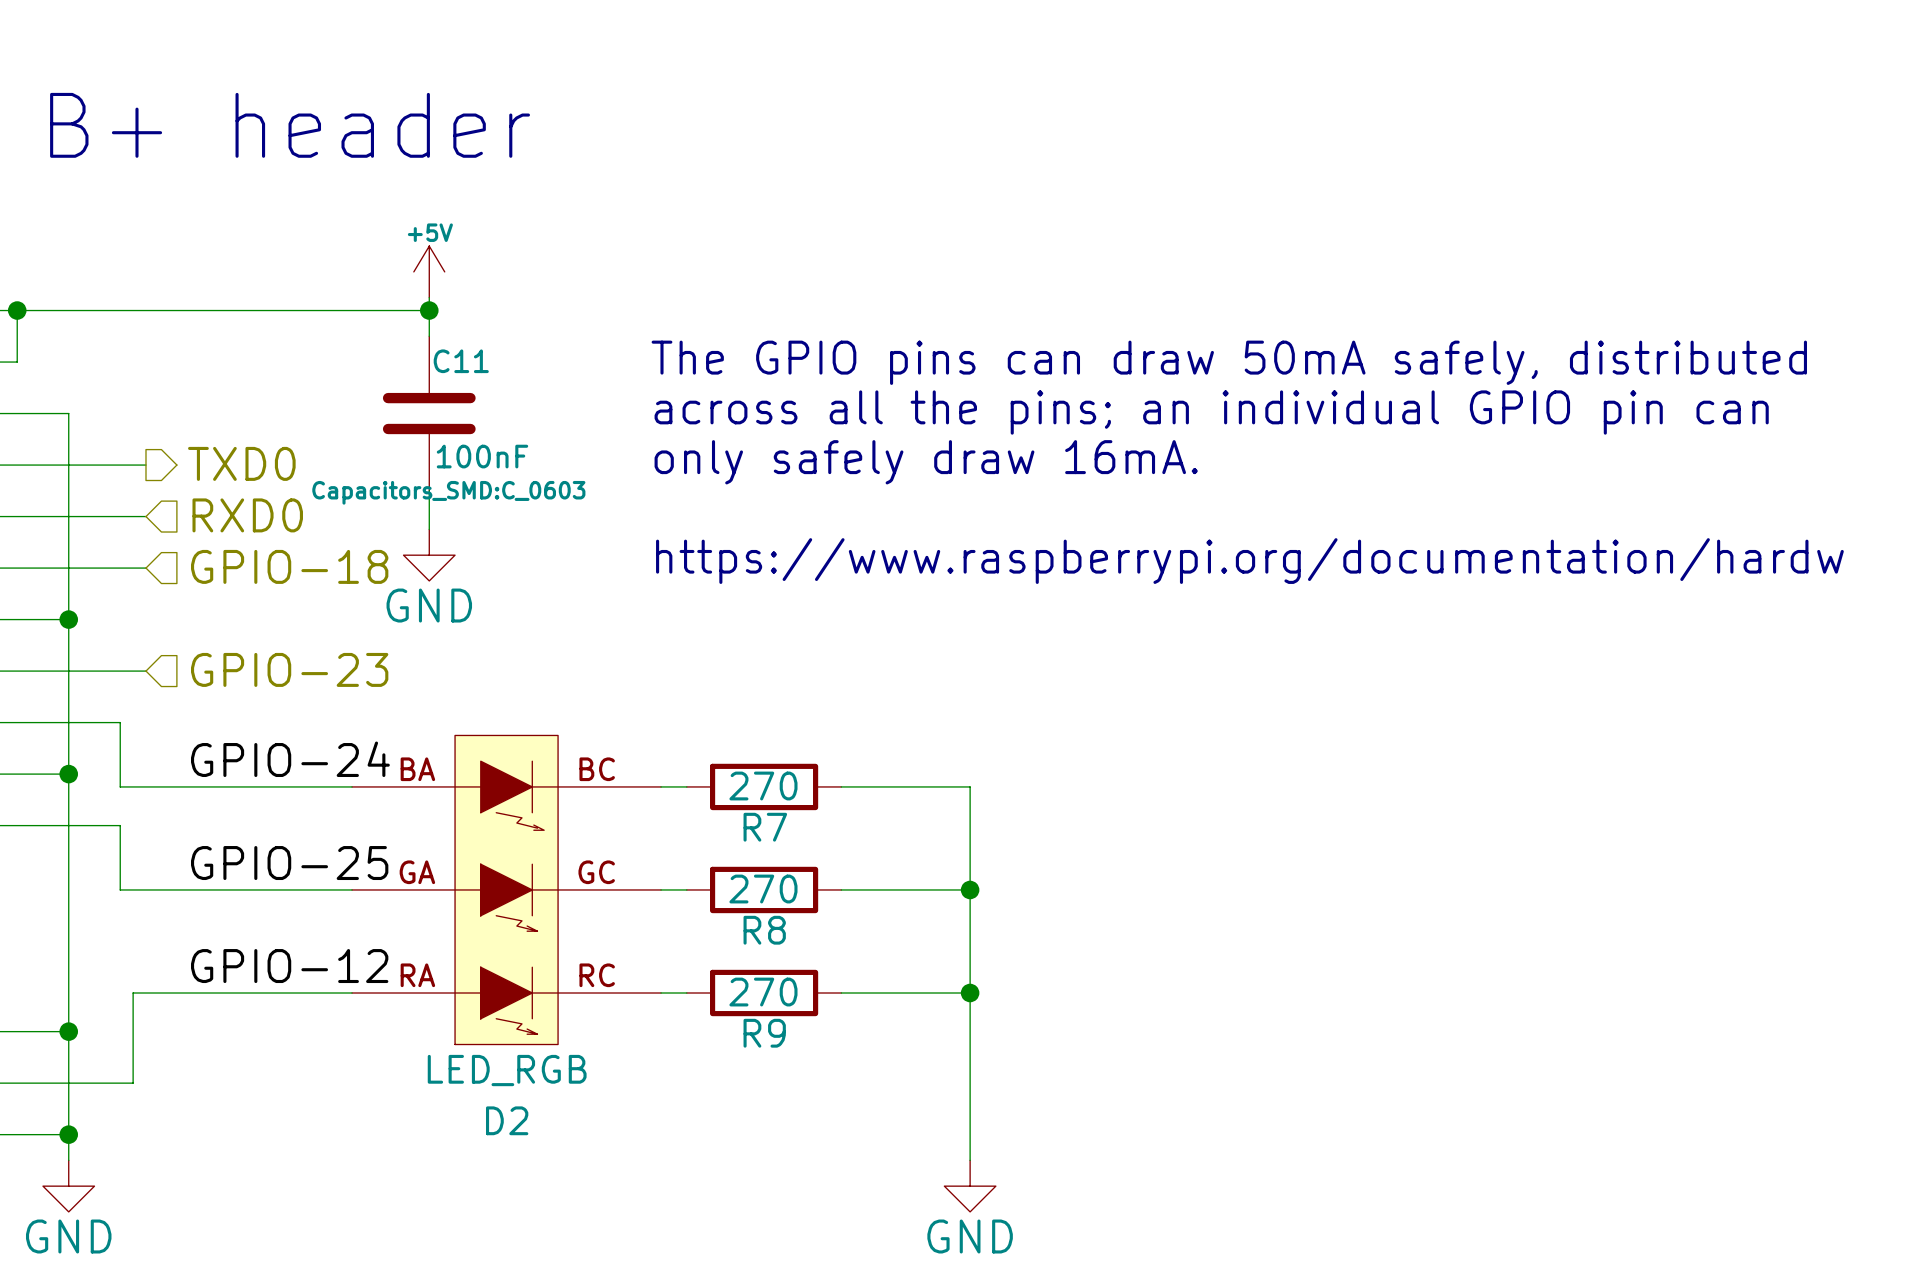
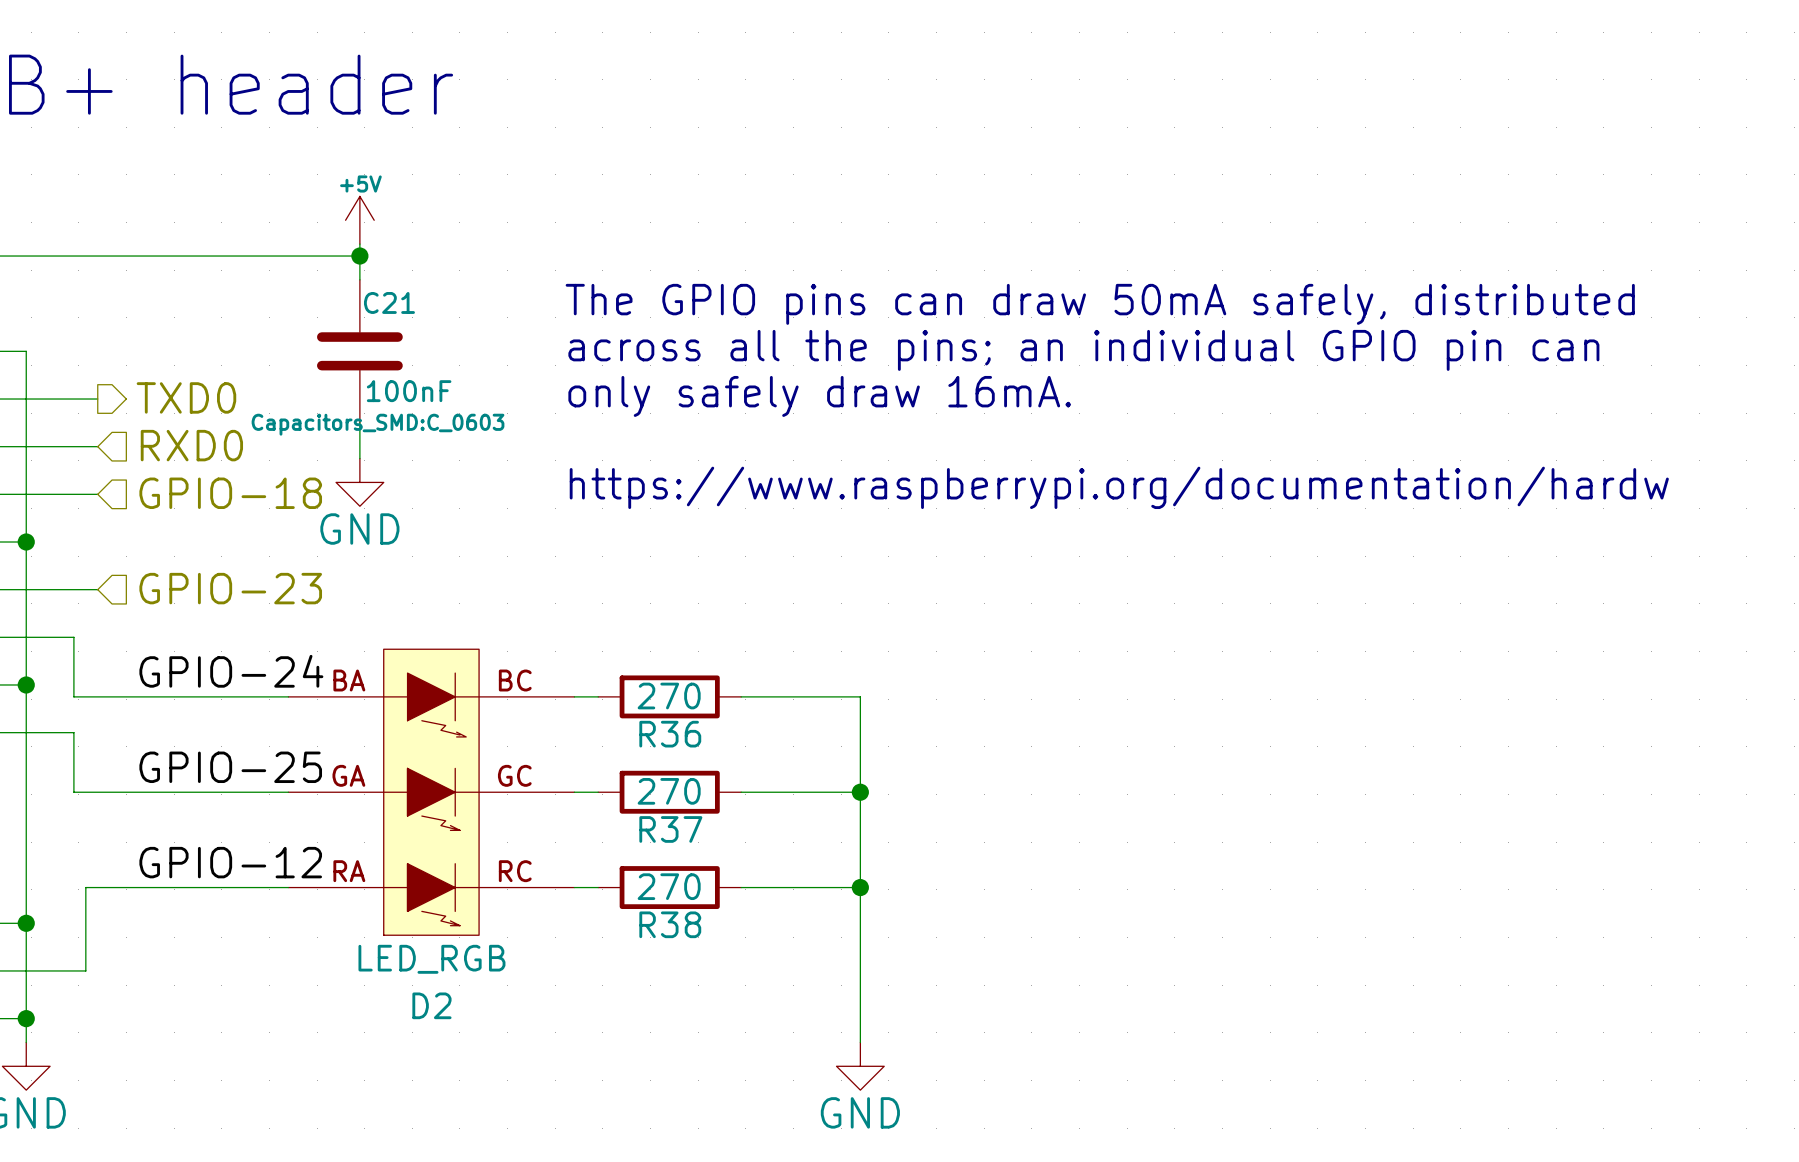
C11 name: C11 (461, 361) -> C21 (389, 302)
R7 name: R7 (765, 827) -> R36 (670, 734)
R8 name: R8 (764, 930) -> R37 (670, 829)
R9 name: R9 (764, 1033) -> R38 (670, 924)

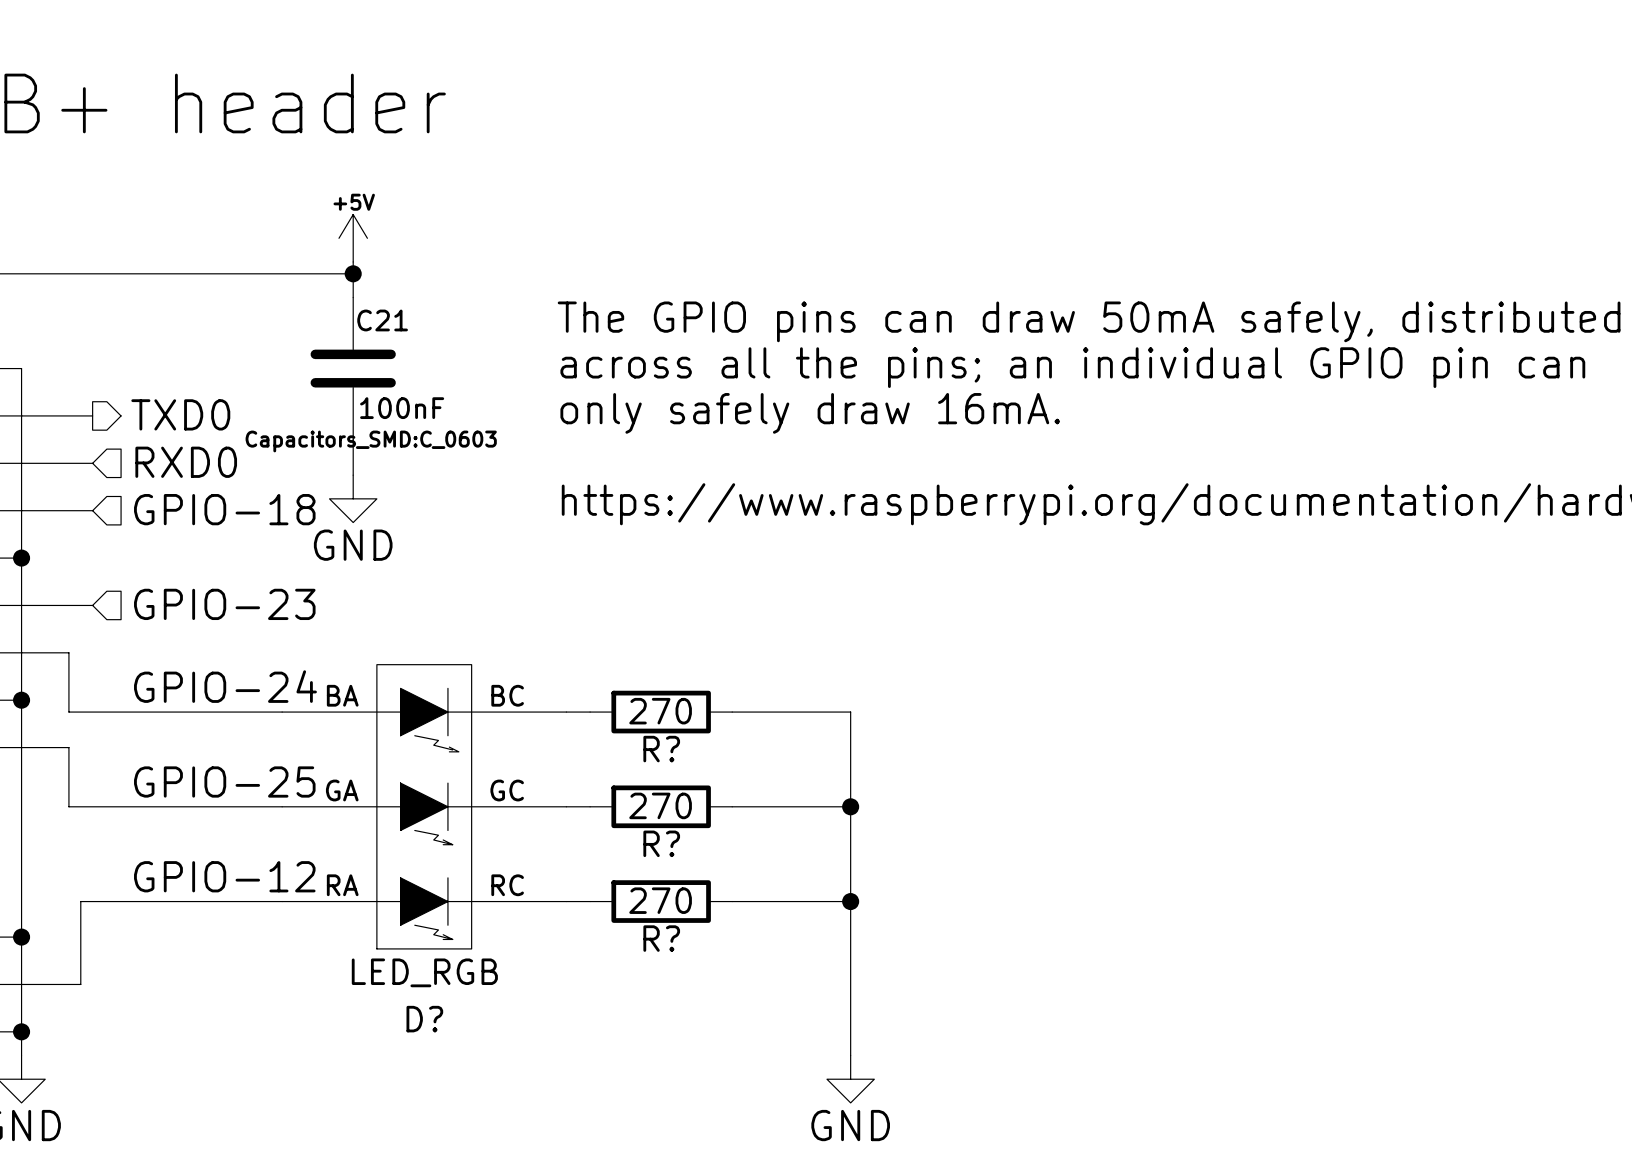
R36 name: R36 (670, 734) -> R? (661, 749)
R37 name: R37 (670, 829) -> R? (661, 843)
R38 name: R38 (670, 924) -> R? (661, 938)
D2 name: D2 (431, 1005) -> D? (424, 1019)

